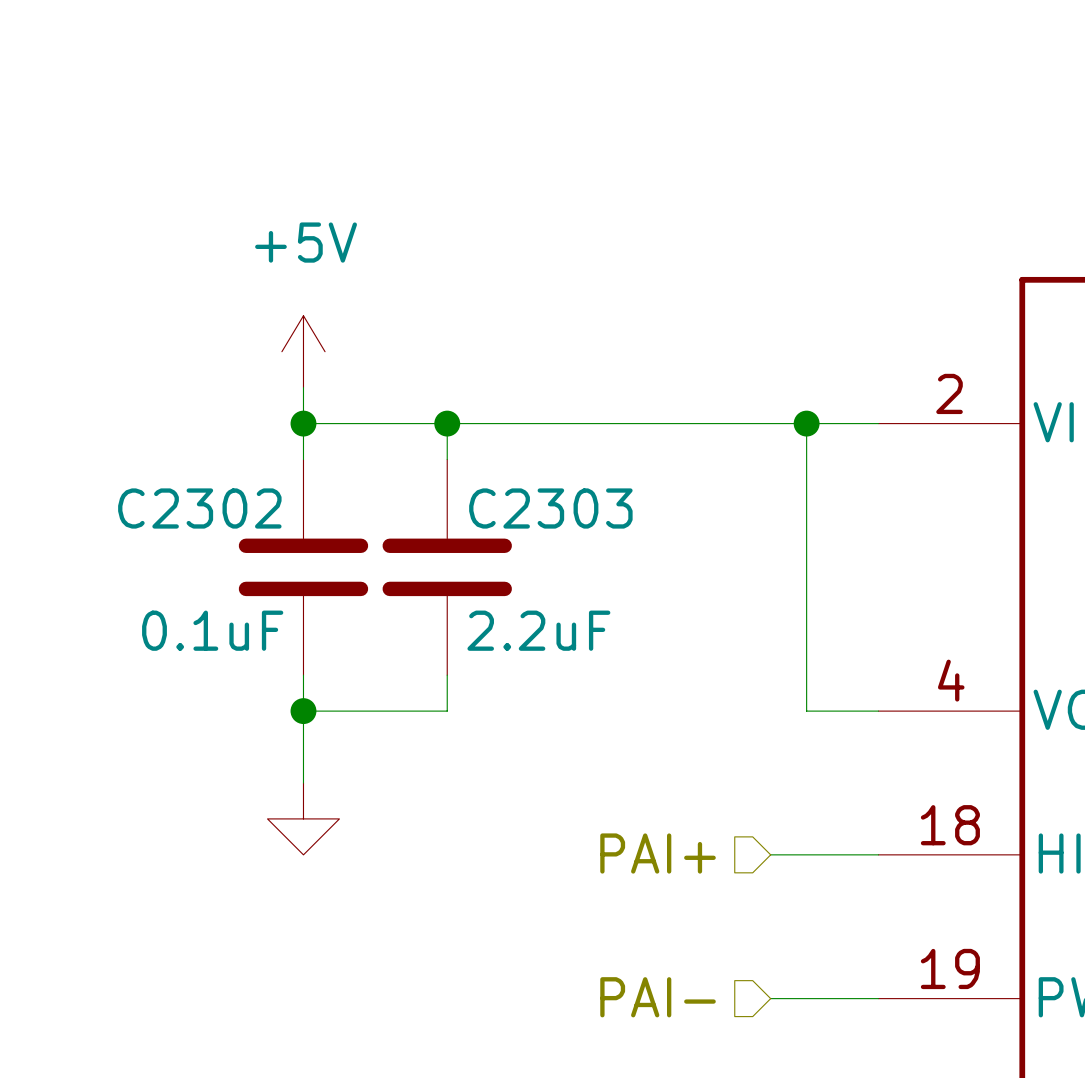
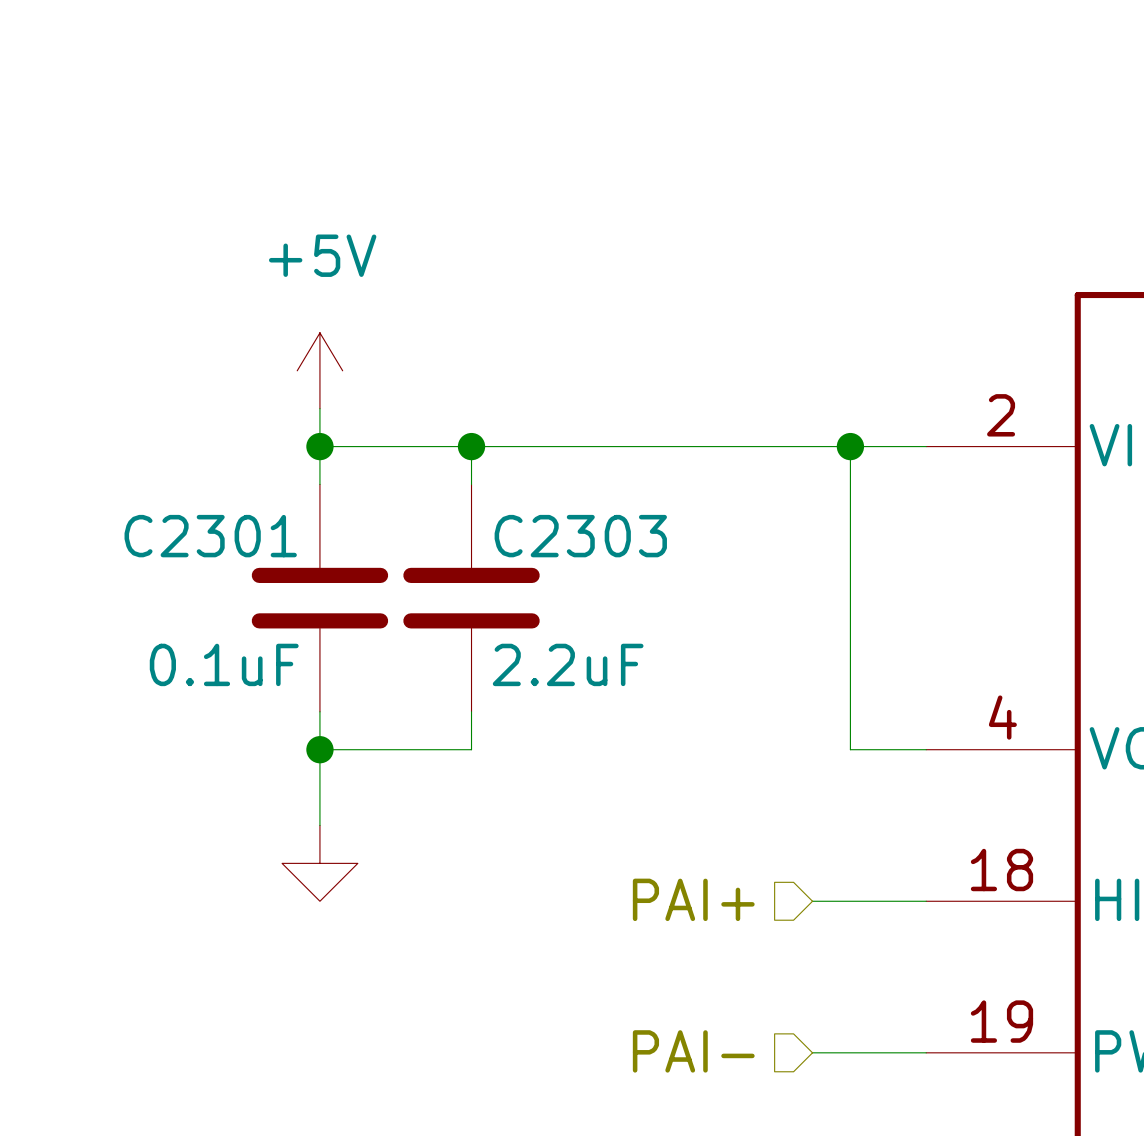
C2302 name: C2302 (199, 508) -> C2301 (210, 536)

